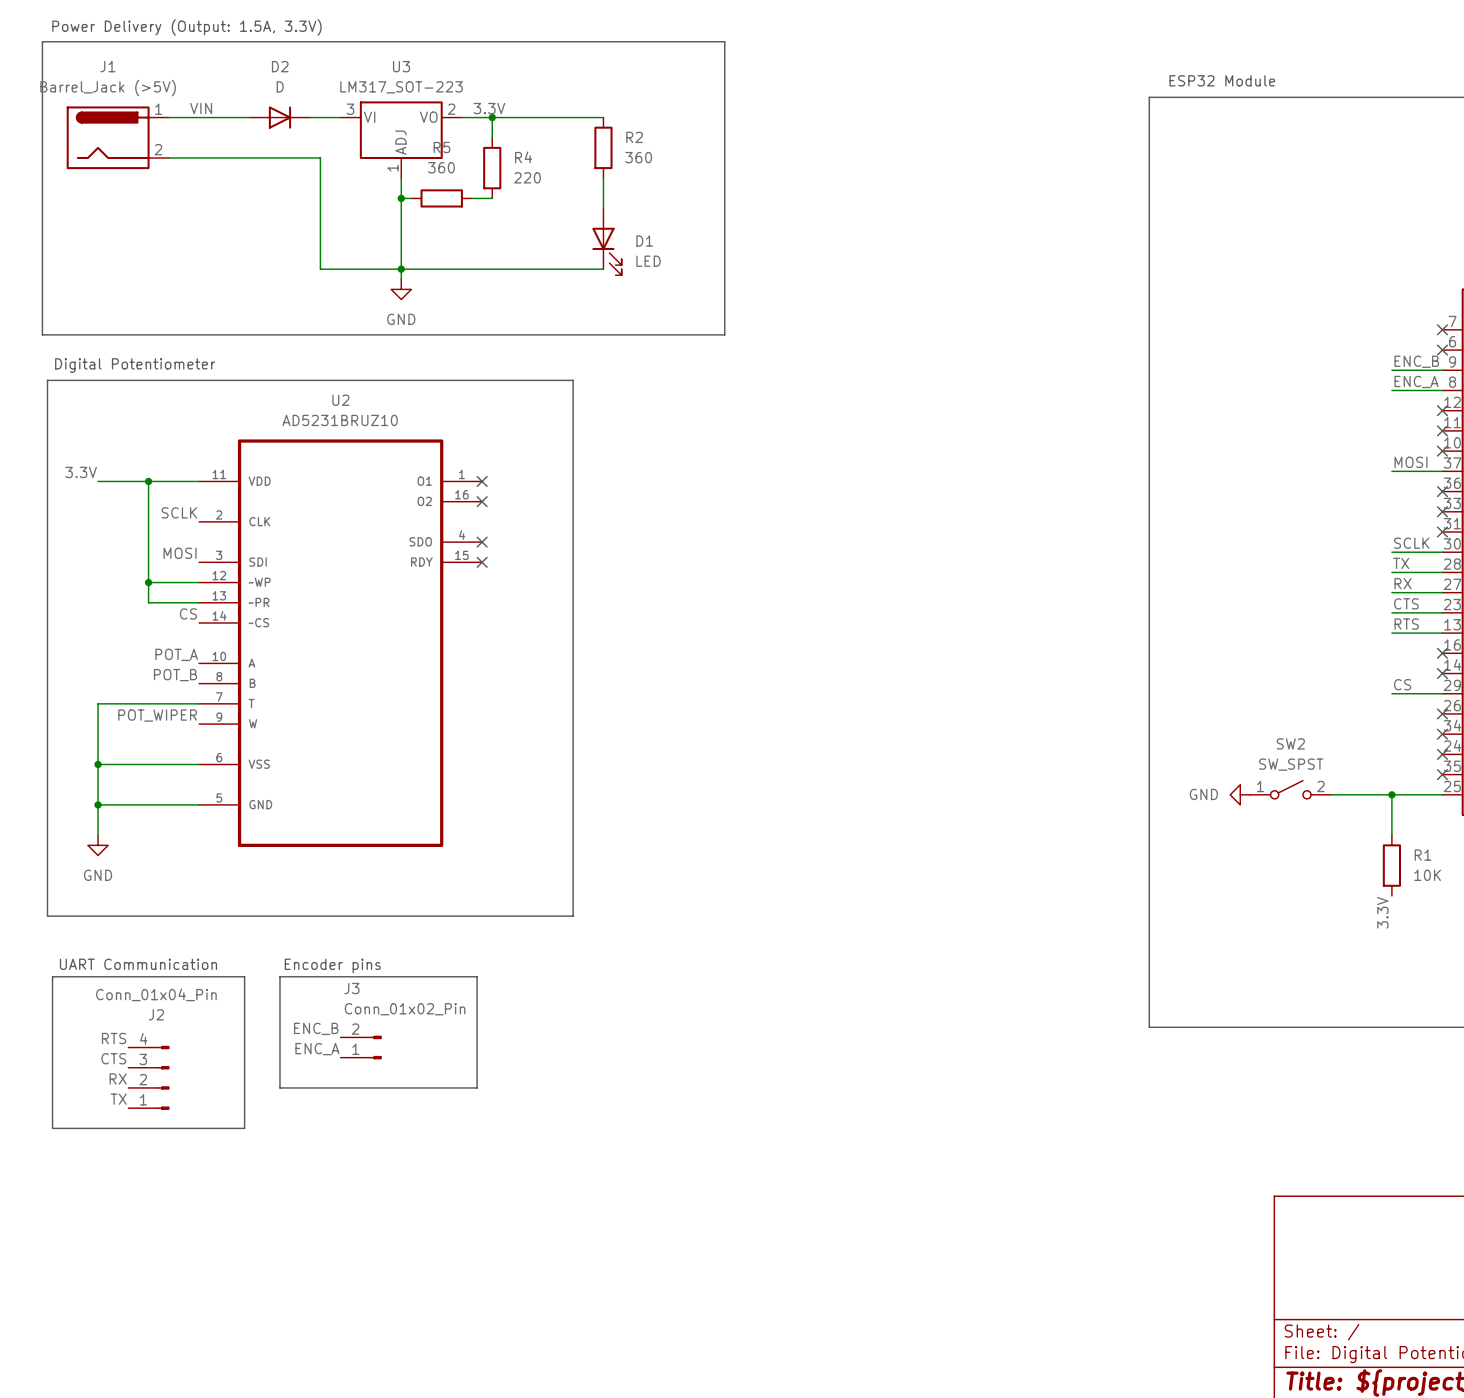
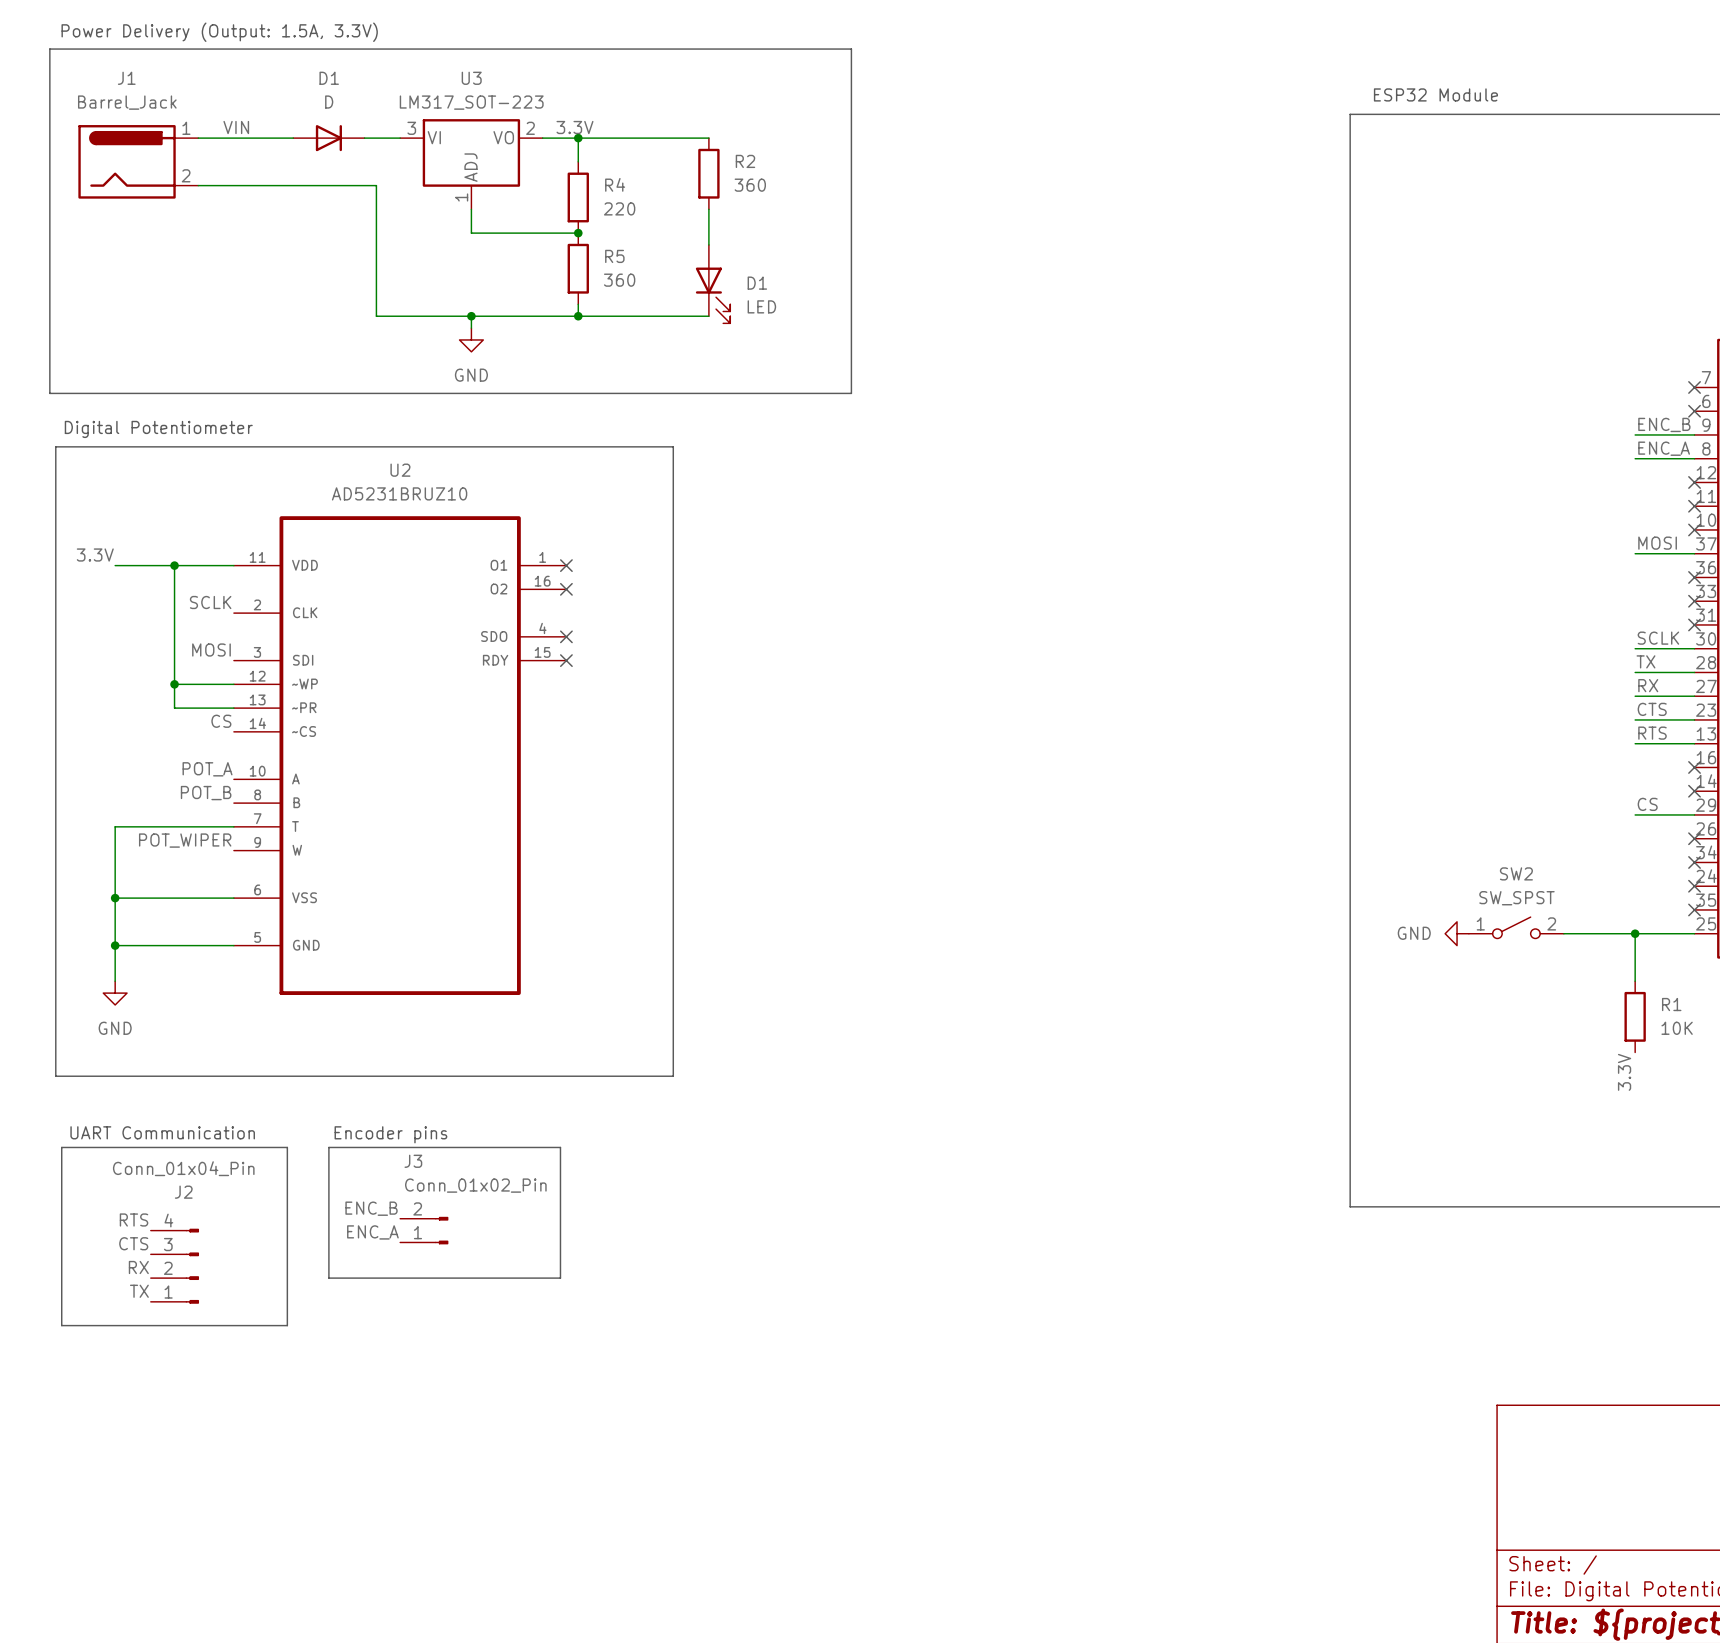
D2 name: D2 (280, 66) -> D1 (329, 78)
J1 value: Barrel_Jack (>5V) (108, 88) -> Barrel_Jack (127, 102)
R5 name position: R5 (441, 147) -> R5 (614, 256)
wire: (401, 198) (401, 269) -> none
junction: (401, 198) -> none
wire: none -> (483, 233) (554, 233)
R5 rotation: 0° (441, 198) -> 90° clockwise (578, 268)
R5 position: (441, 198) -> (578, 268)
junction: none -> (578, 233)
wire: none -> (578, 304) (578, 316)
junction: none -> (578, 316)

